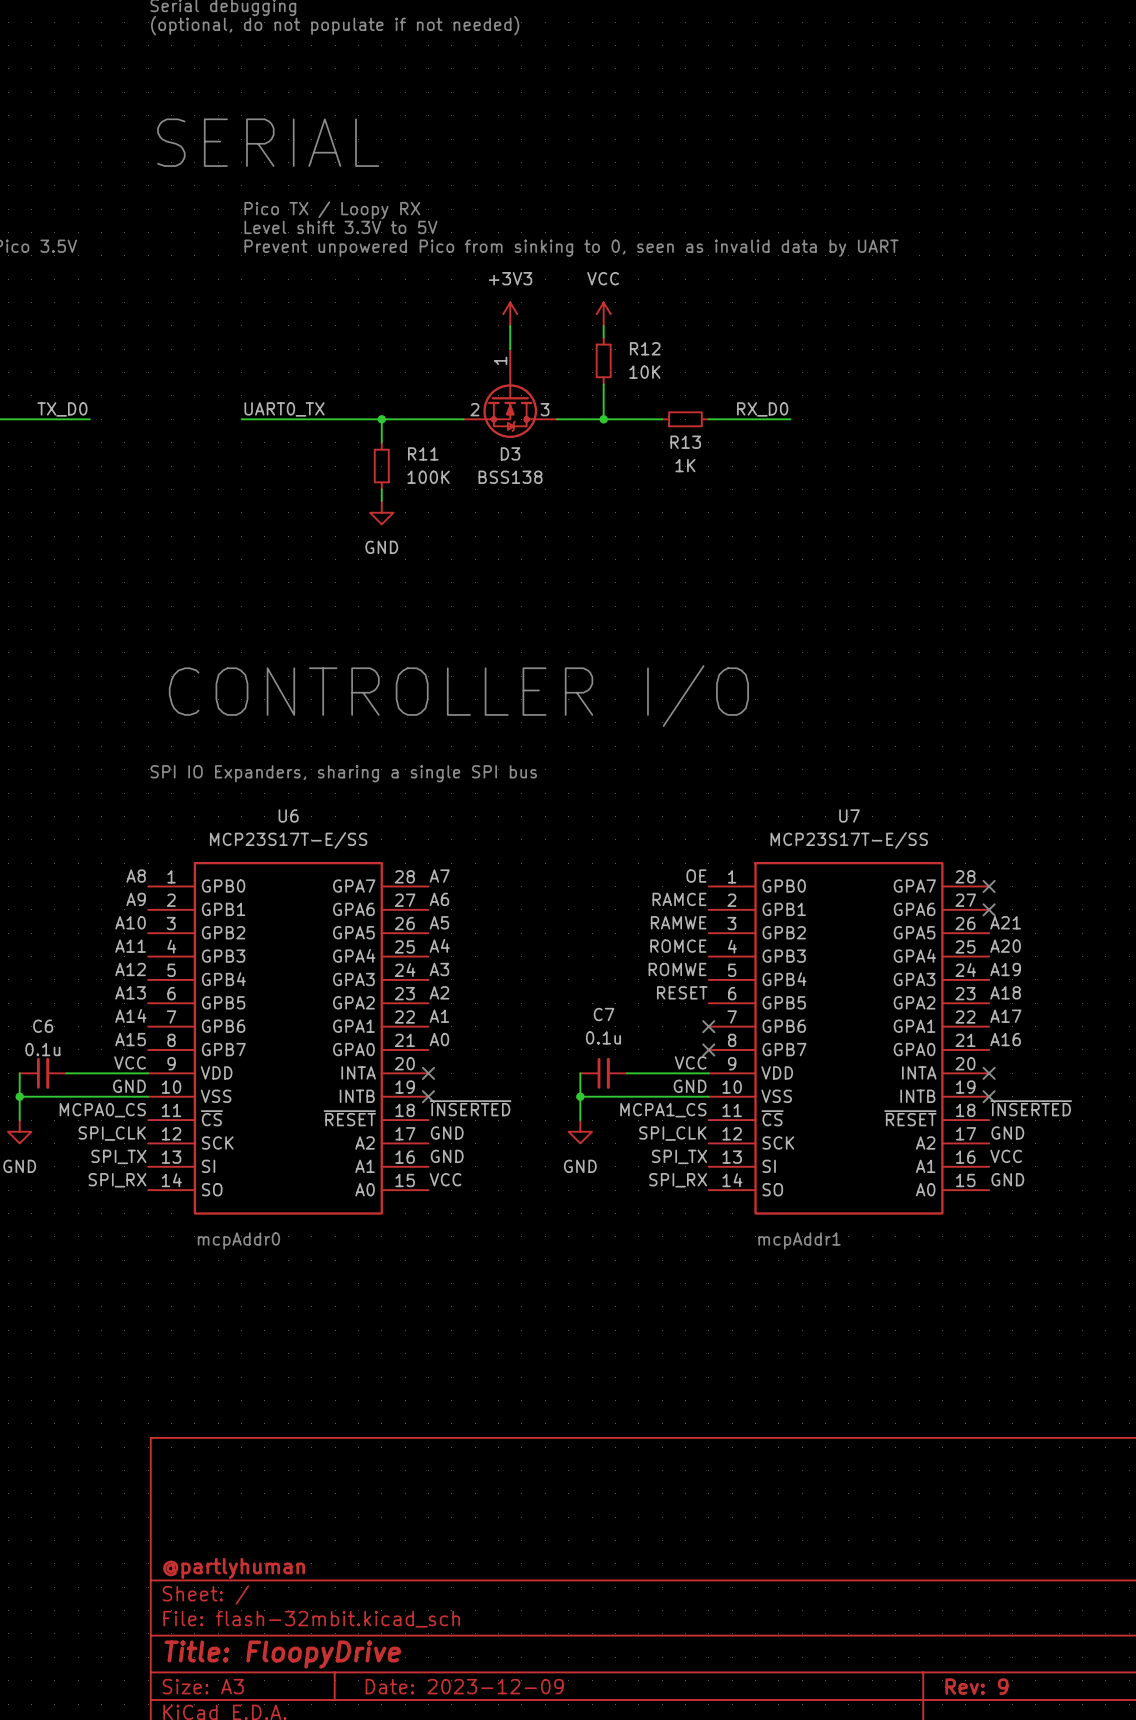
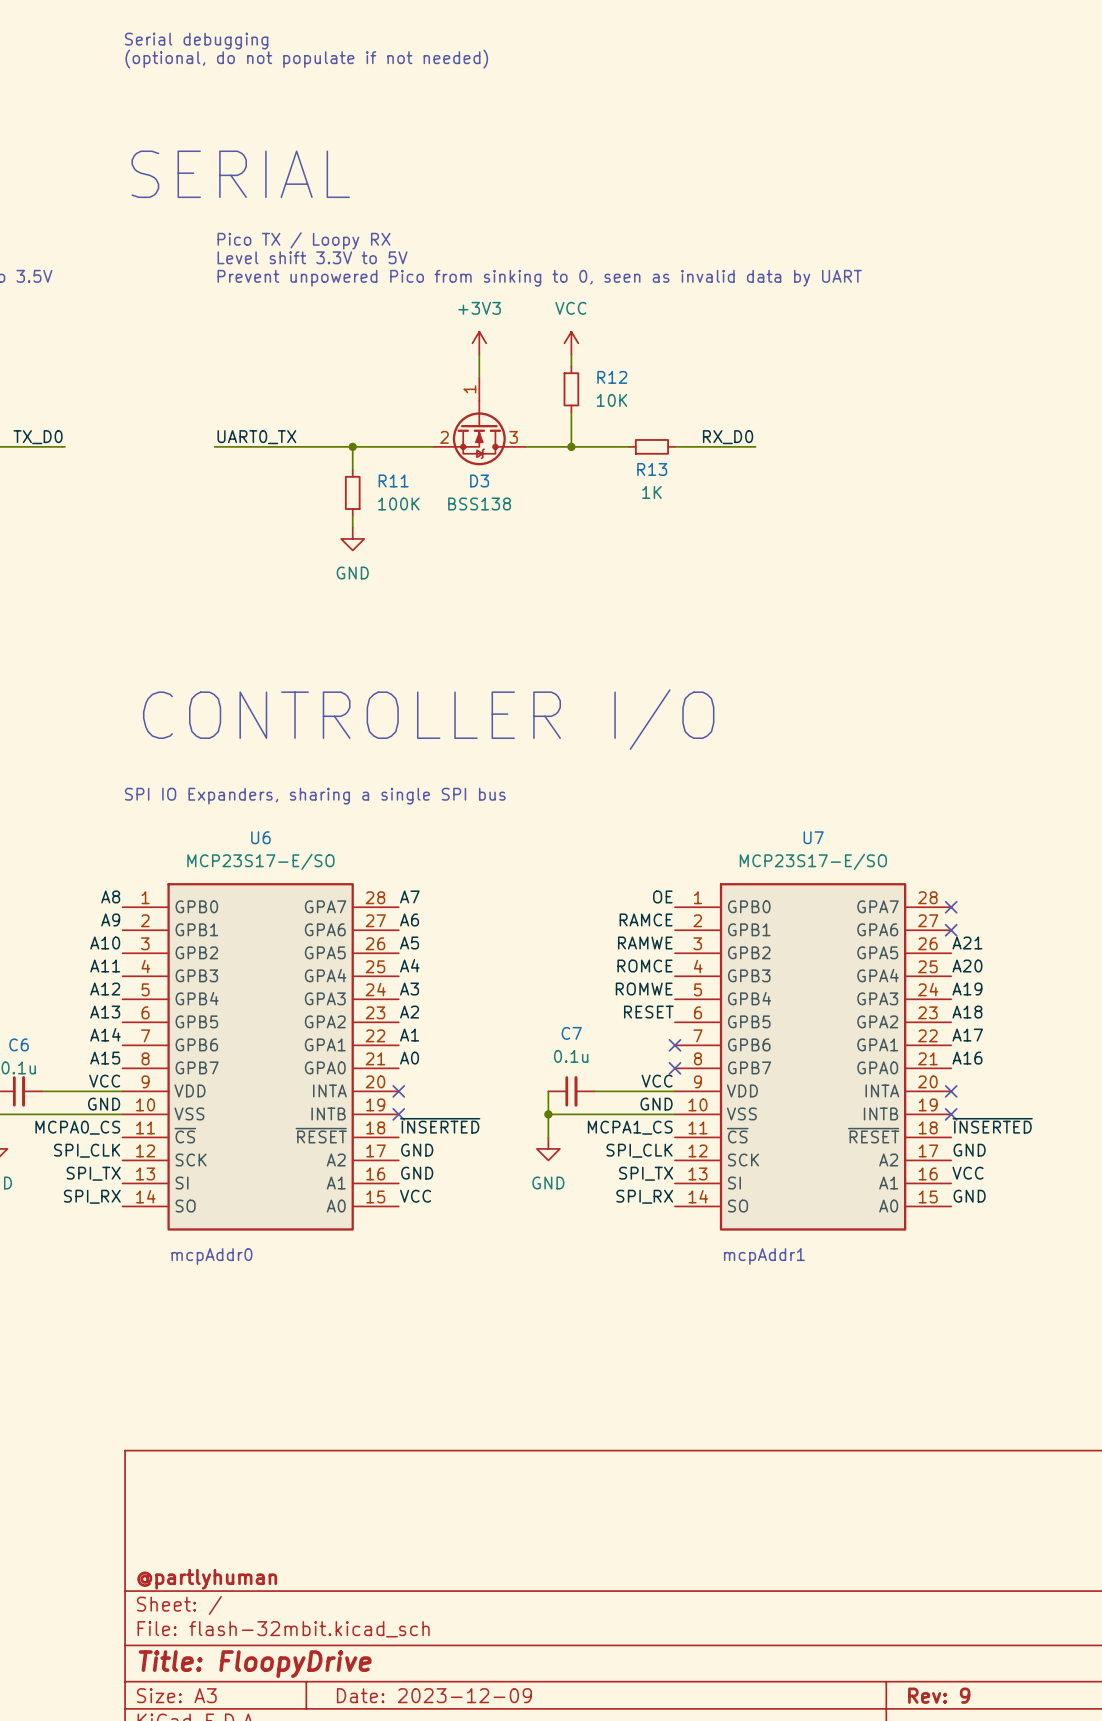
U6 value: MCP23S17T-E/SS (288, 840) -> MCP23S17-E/SO (260, 861)
U7 value: MCP23S17T-E/SS (849, 840) -> MCP23S17-E/SO (813, 861)

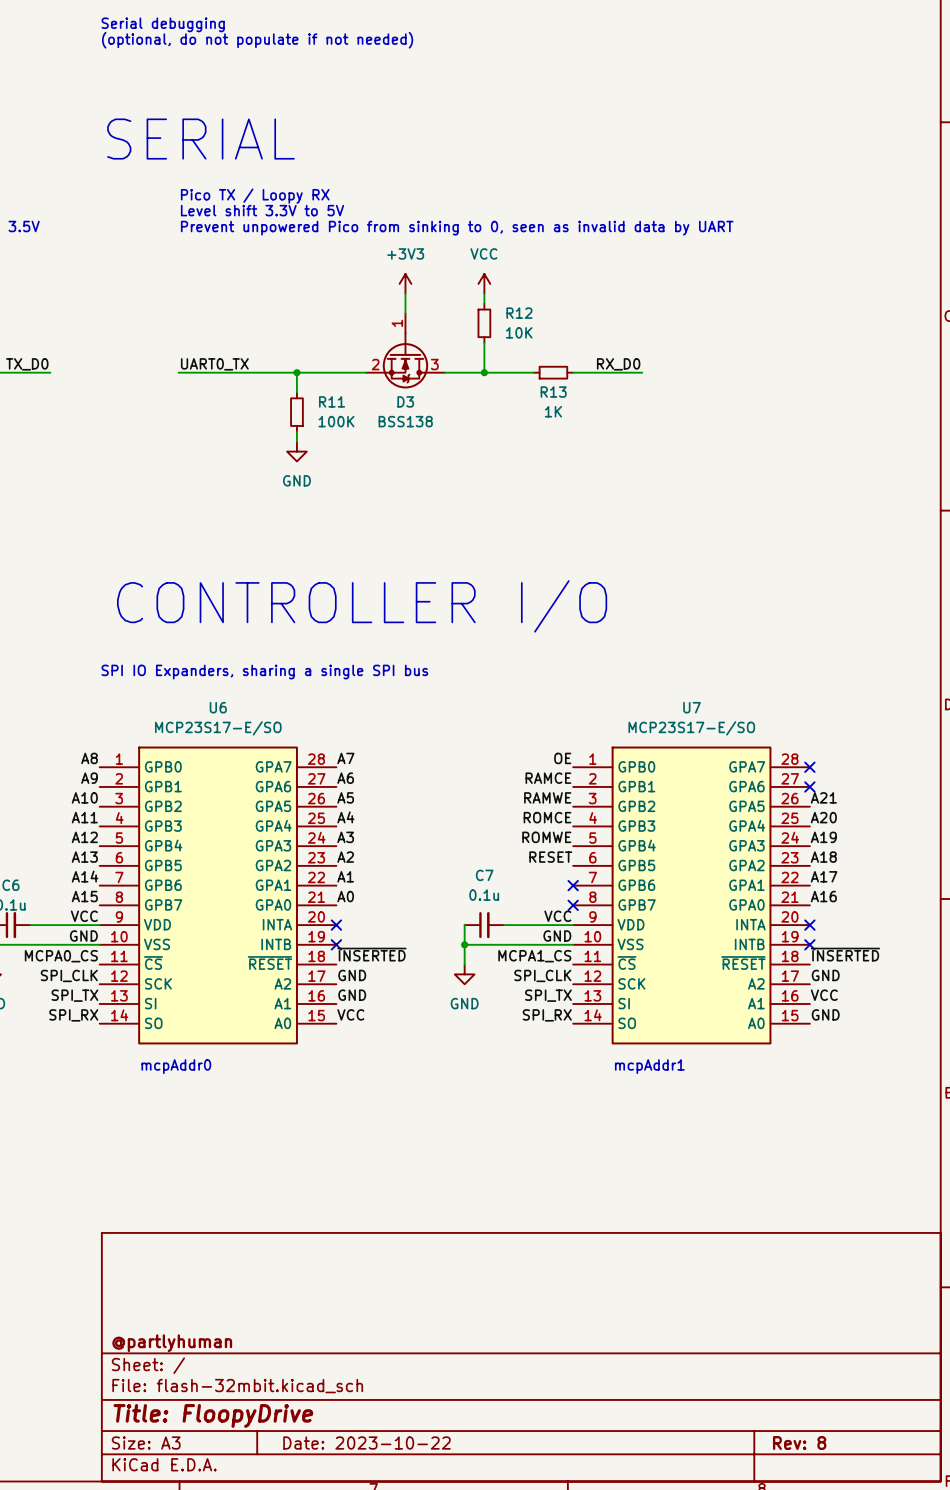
title block: Date: 2023-12-09 (434, 1695) -> Date: 2023-10-22 (366, 1443)
title block: Rev: 9 (939, 1695) -> Rev: 8 (799, 1443)

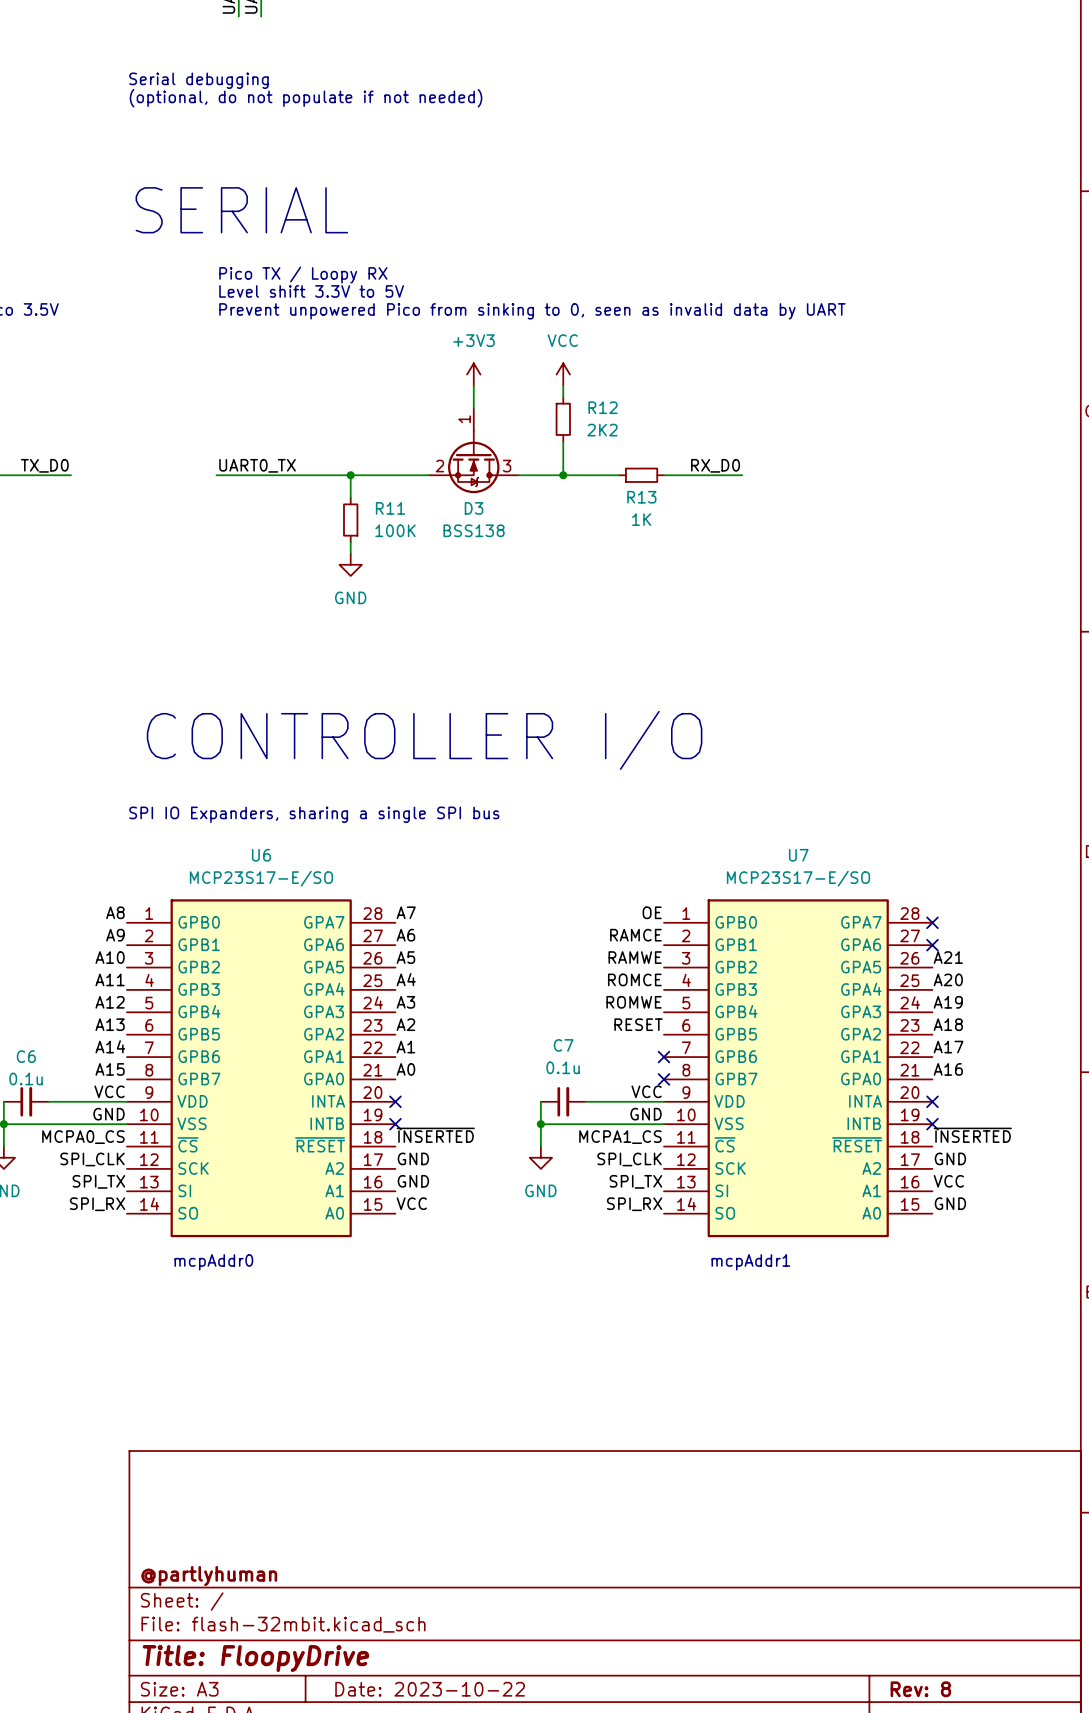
R12 value: 10K (519, 332) -> 2K2 (602, 430)

